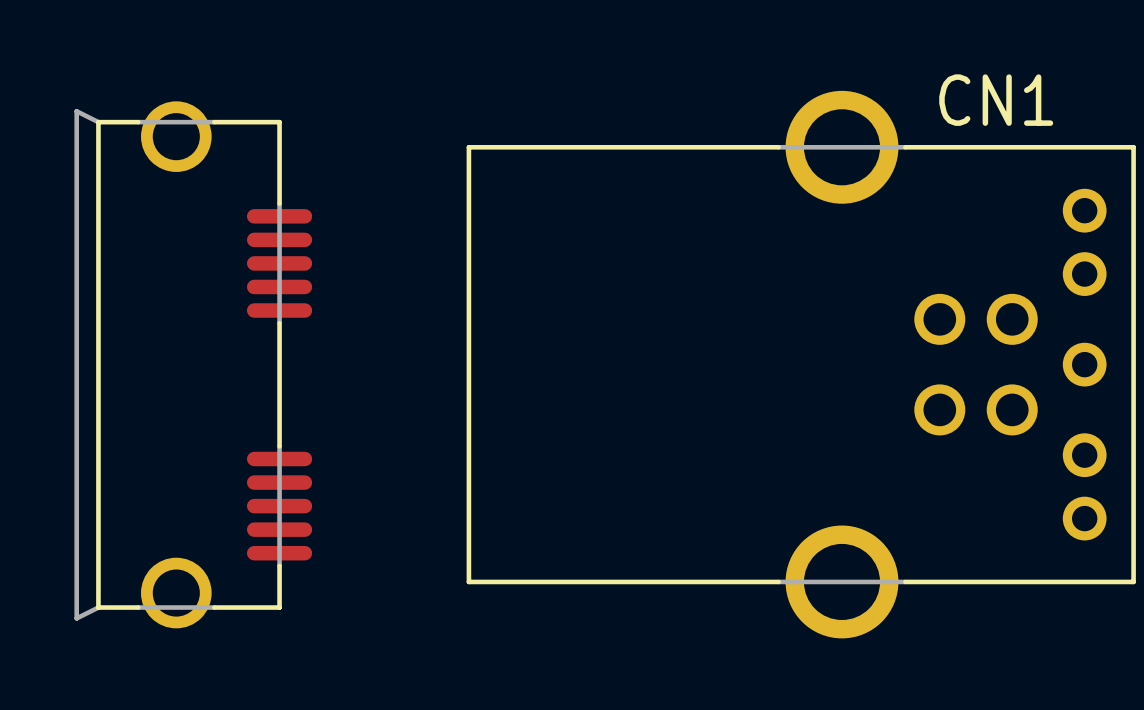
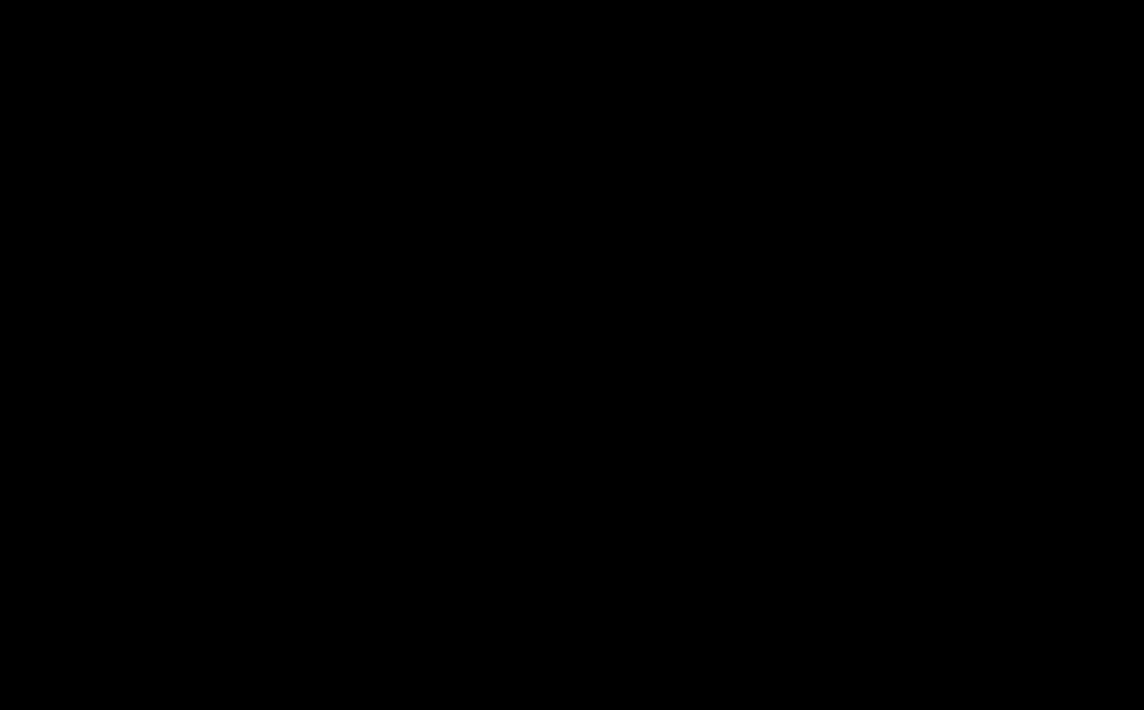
part: (193, 364) -> none
CN1: (801, 364) -> none

